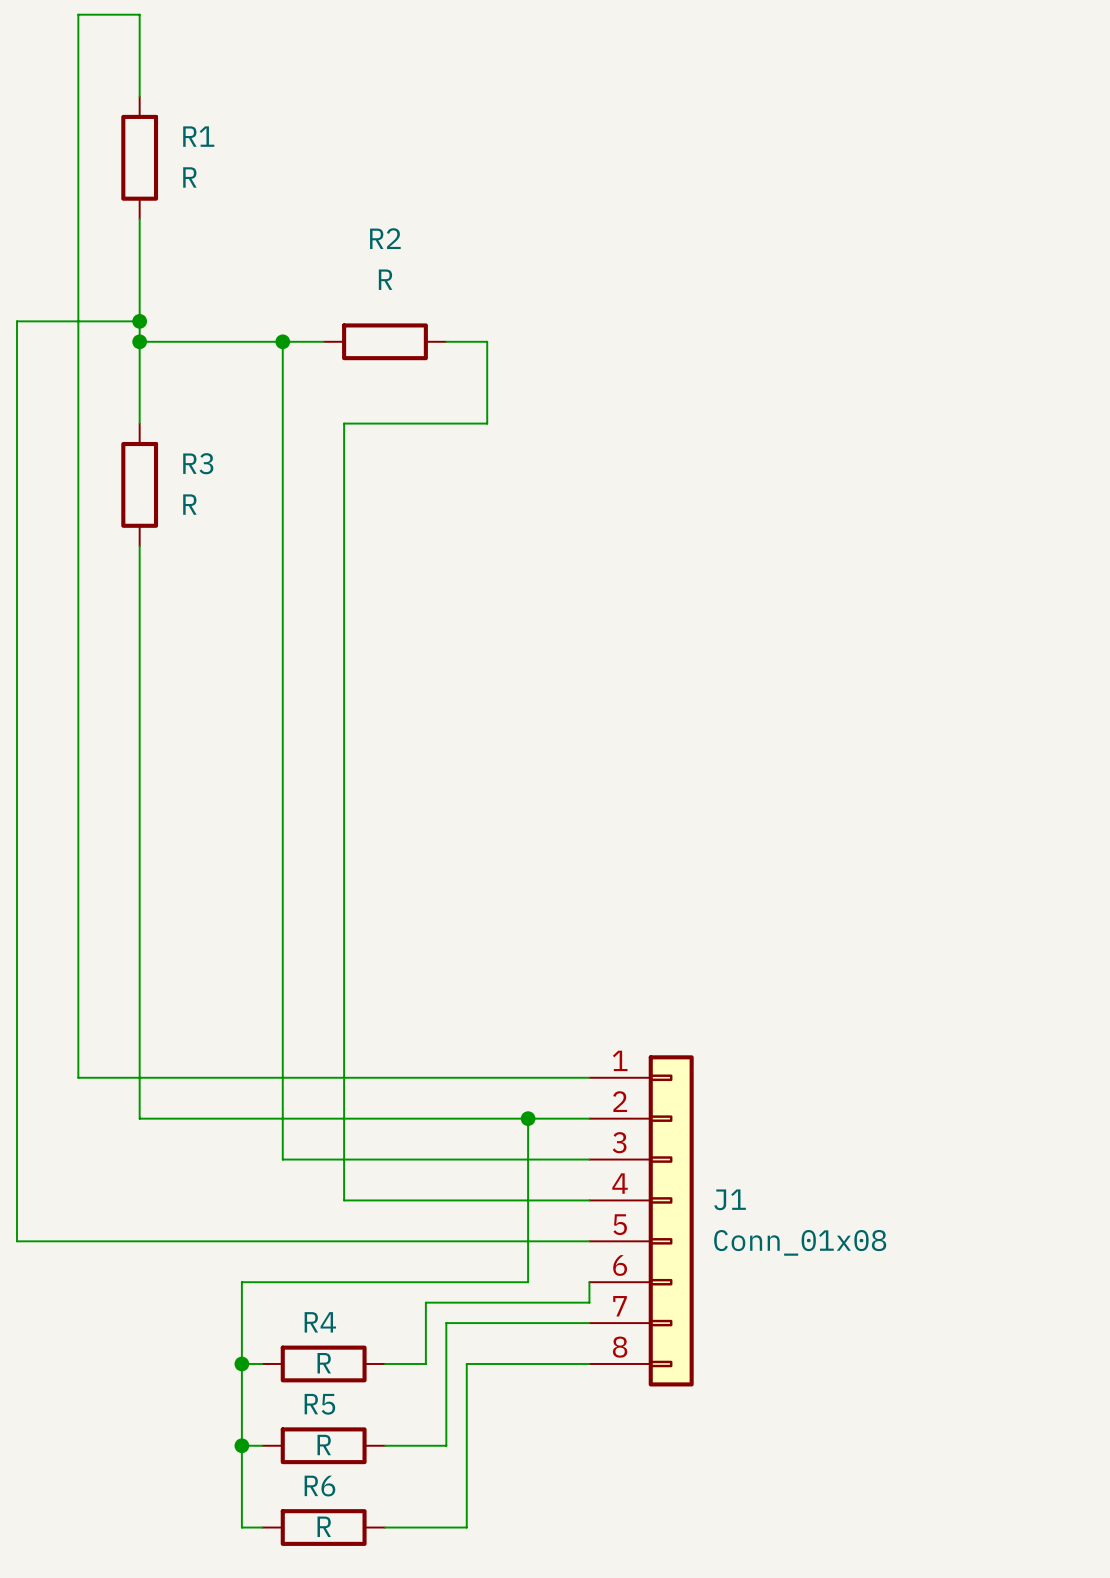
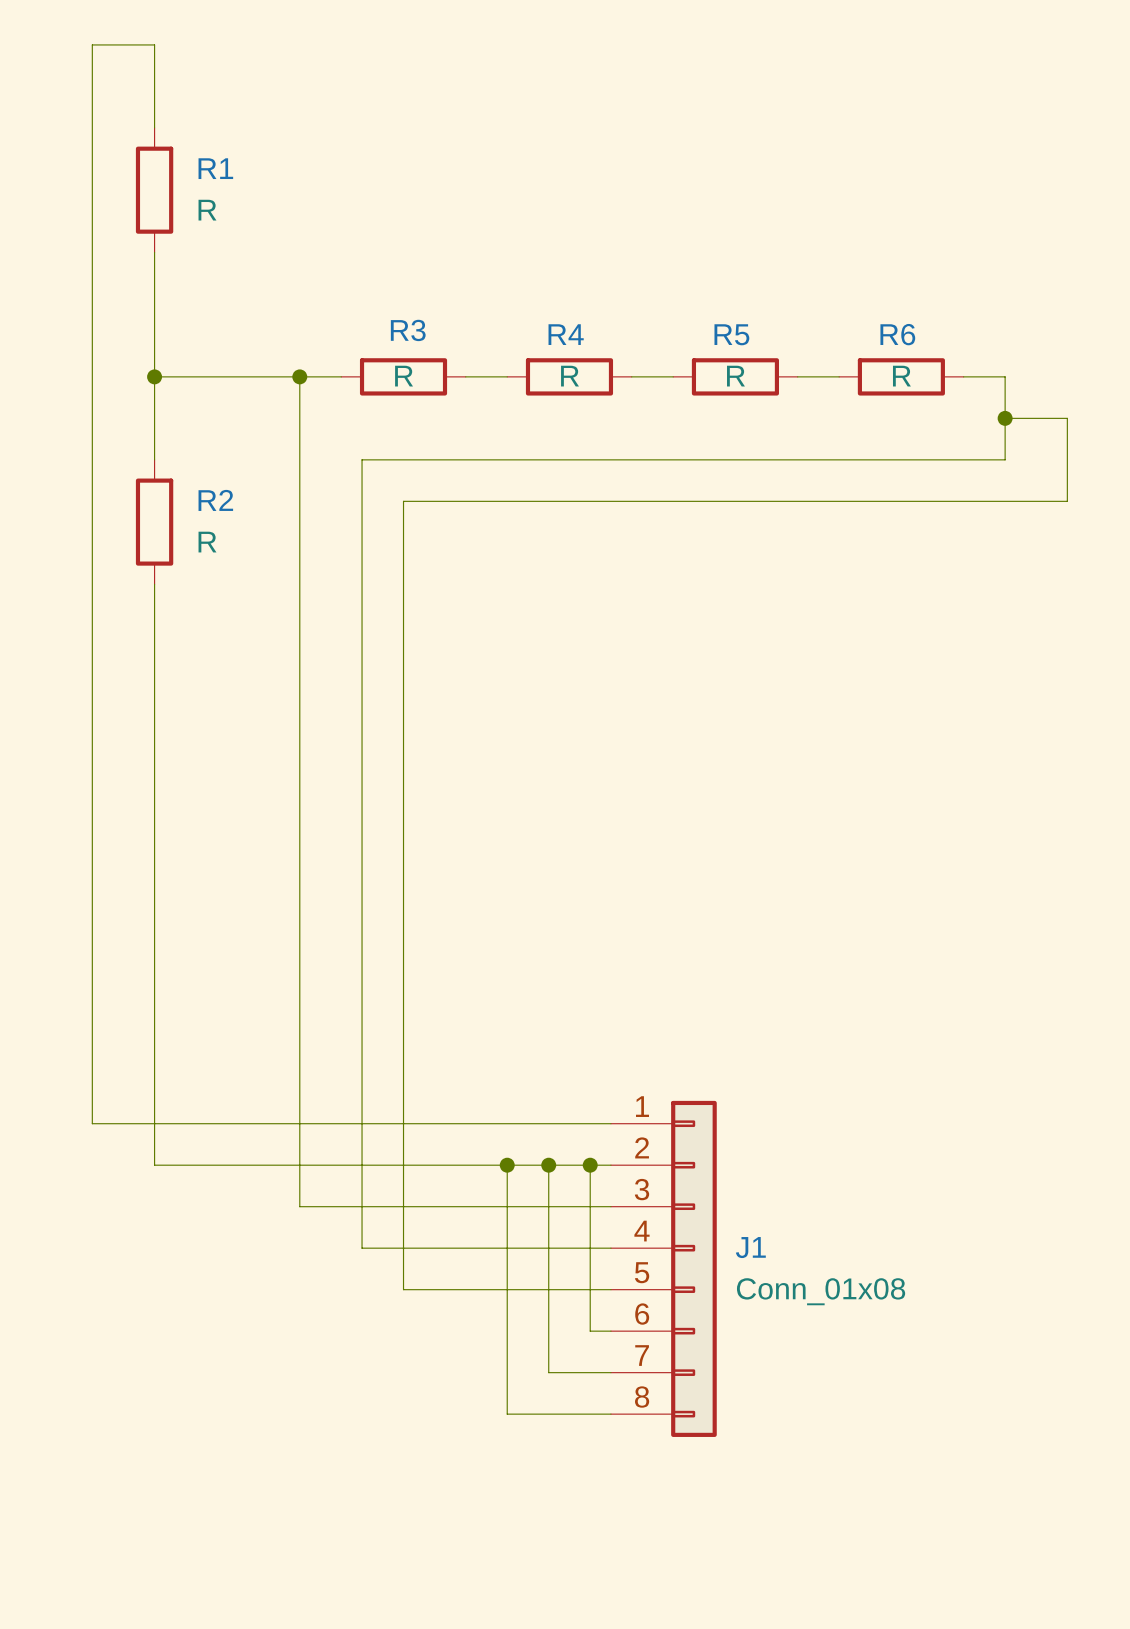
R2 name: R2 (385, 238) -> R3 (408, 330)
R2 value position: R (385, 279) -> R (404, 376)
wire: (139, 321) (17, 321) (17, 1241) (384, 1241) -> (1005, 418) (1067, 418) (1067, 501) (403, 501) (403, 1289)
junction: (139, 321) -> none
wire: (487, 341) (487, 423) -> (963, 376) (1005, 376) (1005, 459) (507, 459)
wire: none -> (631, 376) (673, 376)
wire: none -> (797, 376) (839, 376)
junction: none -> (1005, 418)
R3 name: R3 (198, 463) -> R2 (215, 500)
junction: none -> (507, 1165)
junction: none -> (590, 1165)
wire: (528, 1282) (241, 1282) (241, 1527) (262, 1527) -> none
wire: (589, 1282) (589, 1302) (425, 1302) (425, 1363) (384, 1363) -> (610, 1331) (590, 1331) (590, 1165)
wire: (528, 1323) (446, 1323) (446, 1445) (384, 1445) -> (548, 1372) (548, 1331)
wire: (241, 1363) (262, 1363) -> none
junction: (241, 1363) -> none
R4 position: (323, 1363) -> (569, 376)
wire: (487, 1363) (466, 1363) (466, 1527) (384, 1527) -> (507, 1414) (507, 1165)
wire: (241, 1445) (262, 1445) -> none
junction: (241, 1445) -> none
R5 position: (323, 1445) -> (735, 376)
R6 position: (323, 1527) -> (901, 376)

